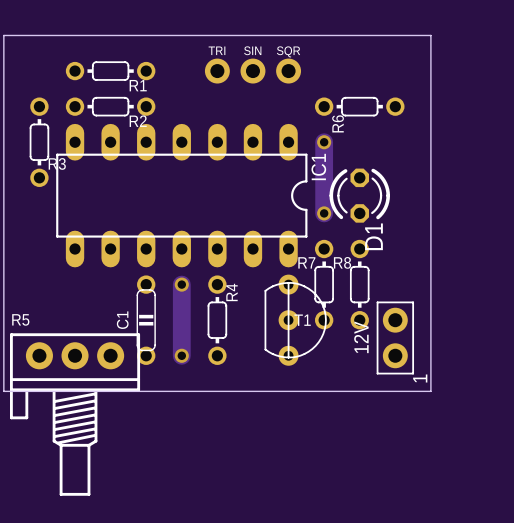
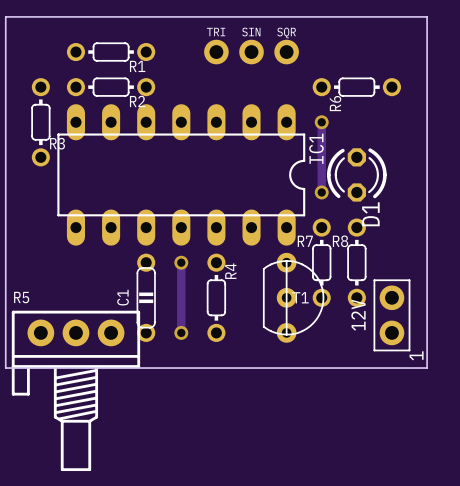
track width: thick (324, 142) (324, 213) -> thin (321, 122) (321, 192)
track width: thick (181, 284) (181, 355) -> thin (181, 262) (181, 332)

